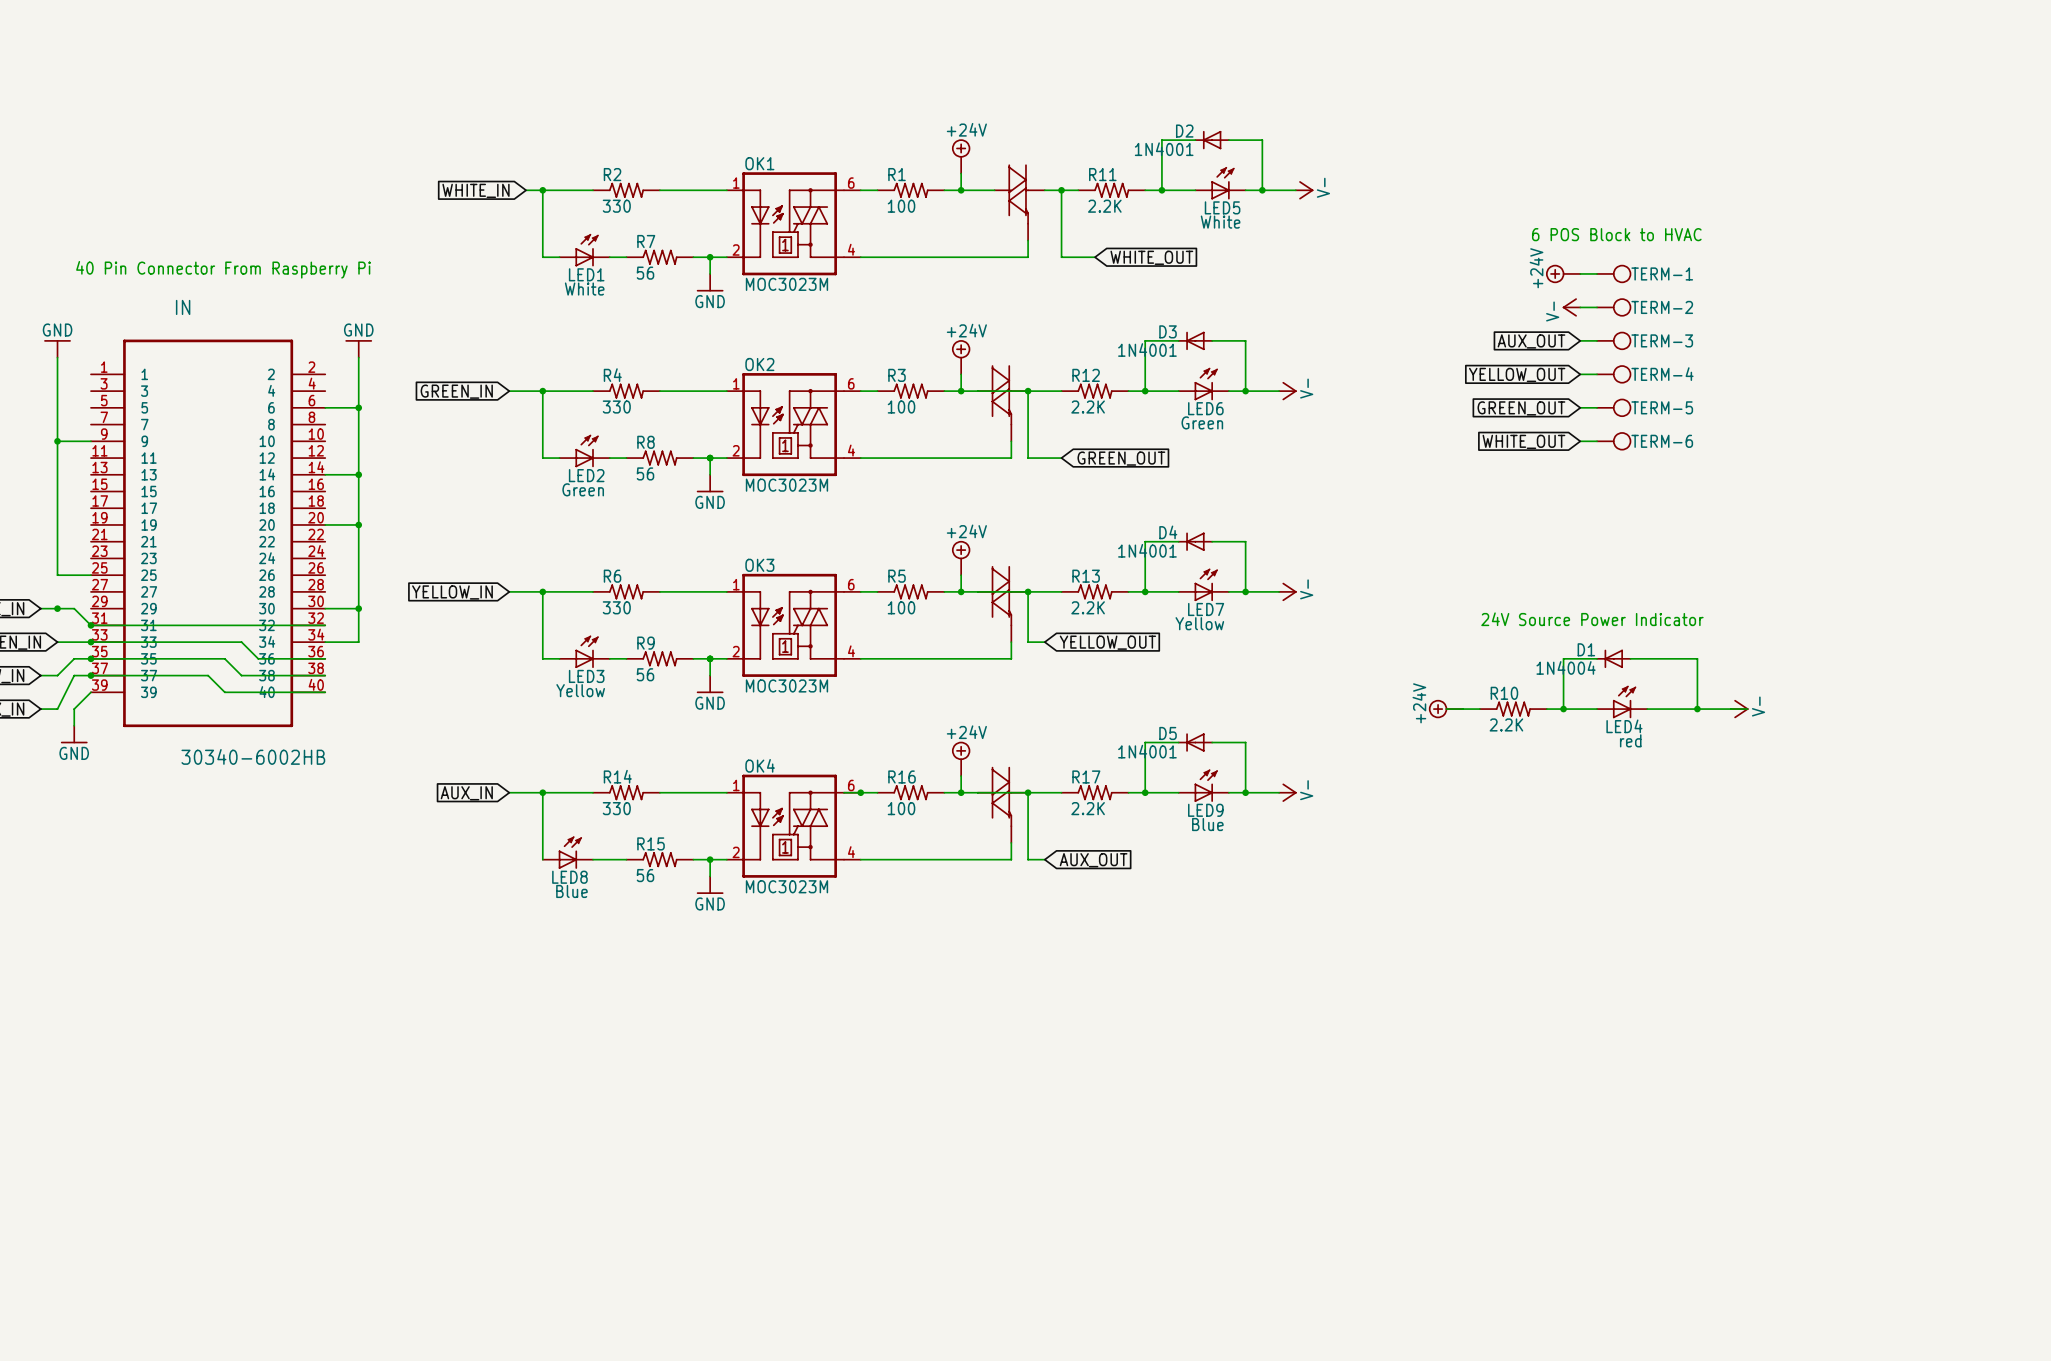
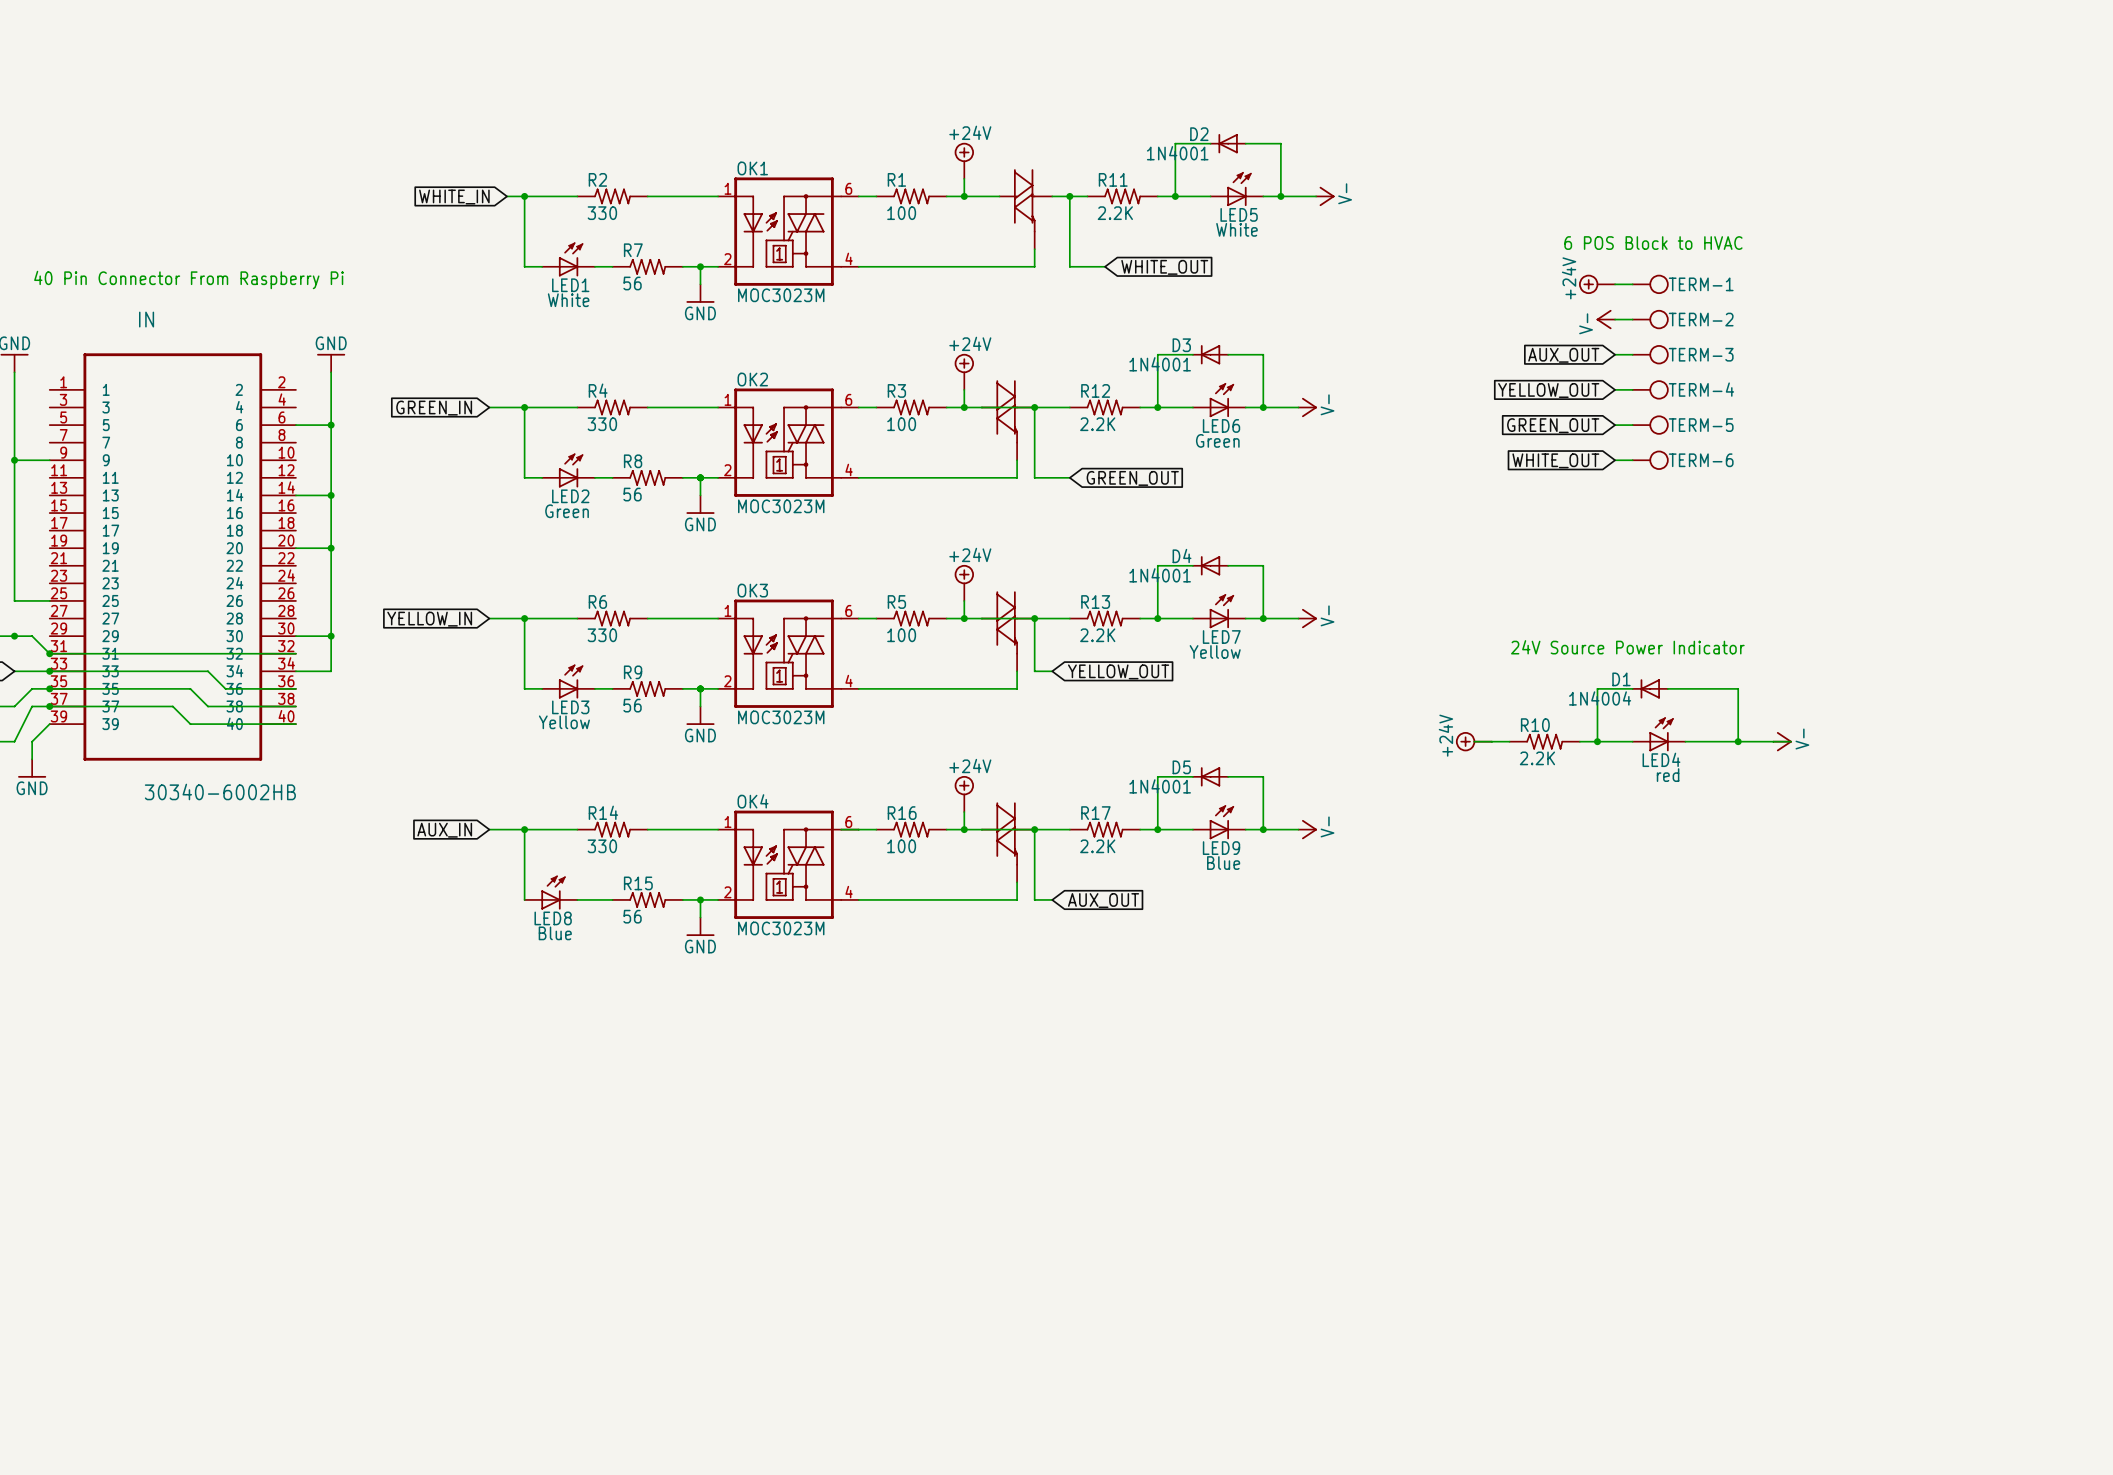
junction: (860, 792) -> none

